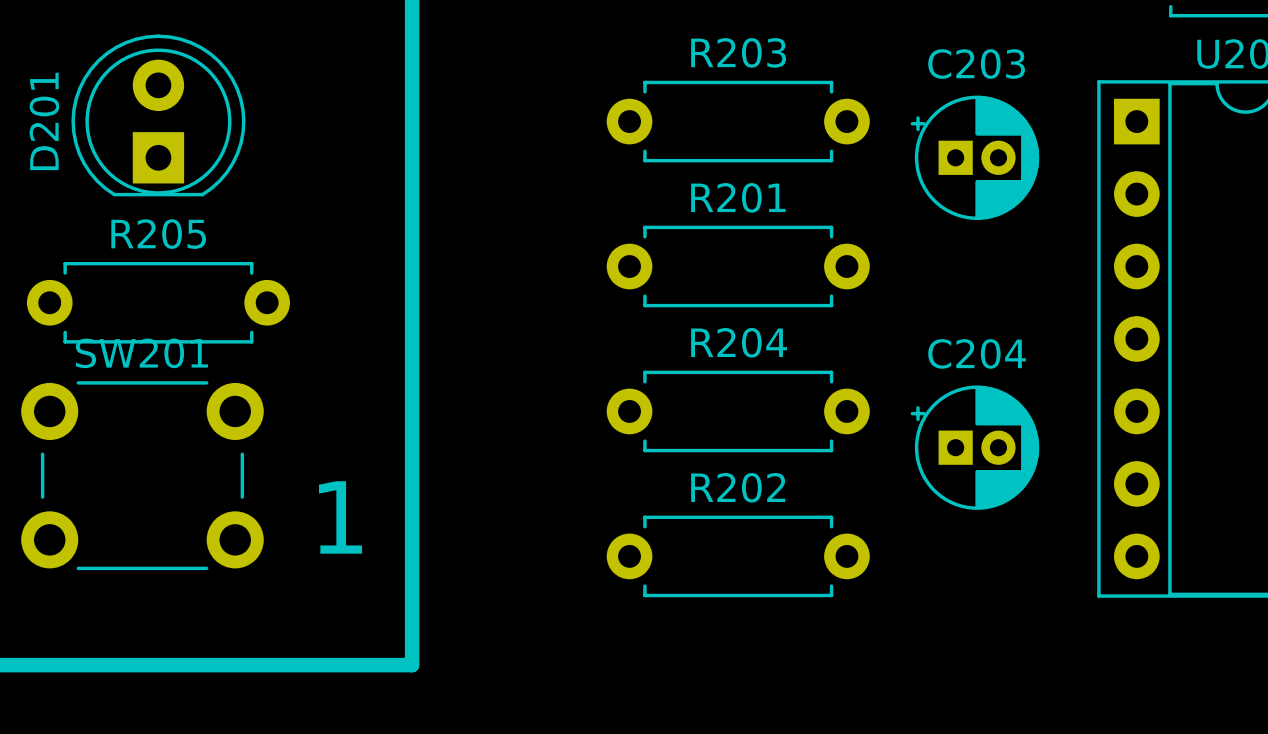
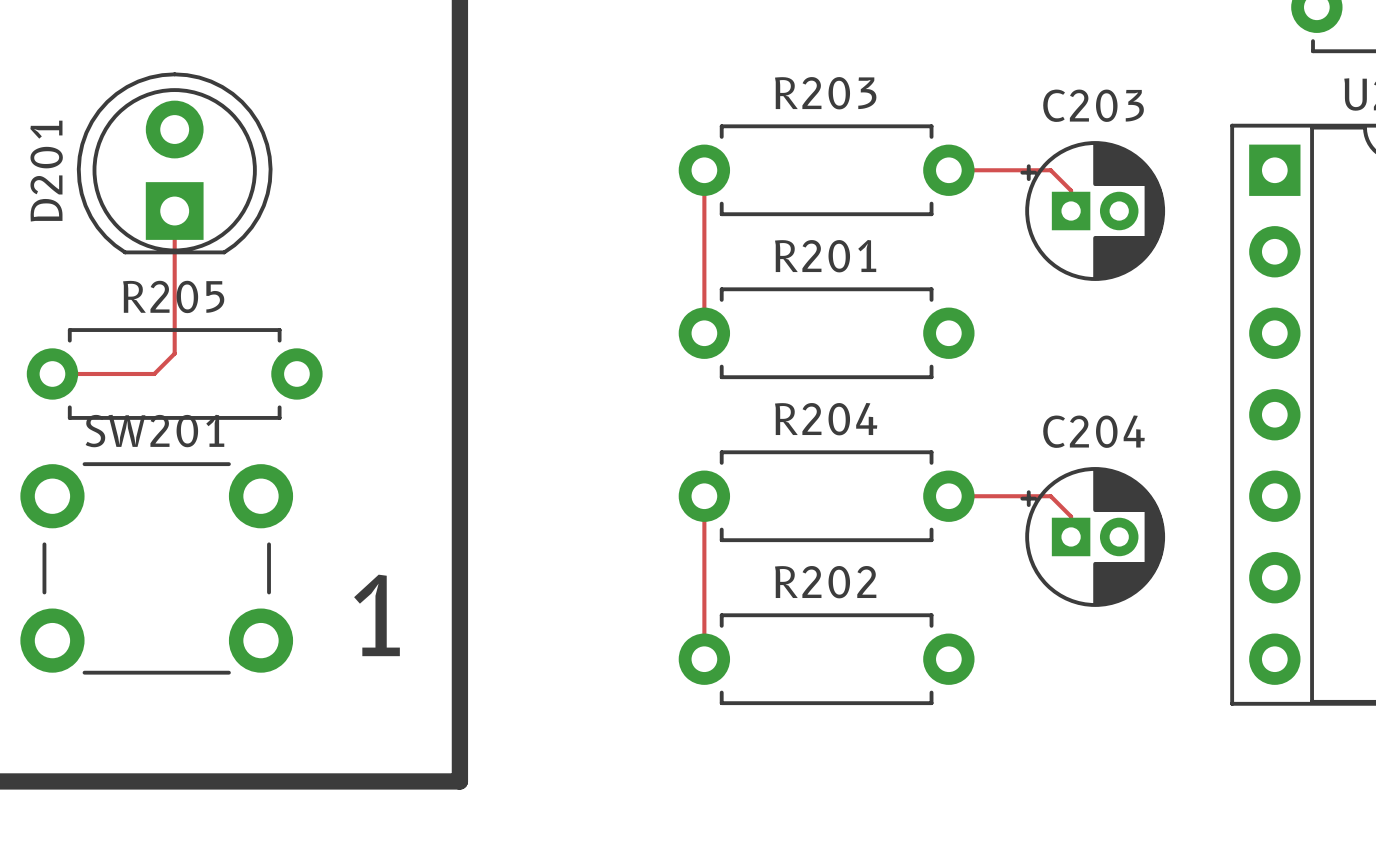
track: none -> (704, 170) (704, 333)
track: none -> (948, 170) (1050, 170) (1071, 190) (1071, 211)
track: none -> (174, 211) (174, 353) (154, 373) (52, 373)
track: none -> (704, 496) (704, 659)
track: none -> (948, 496) (1050, 496) (1071, 516) (1071, 536)

